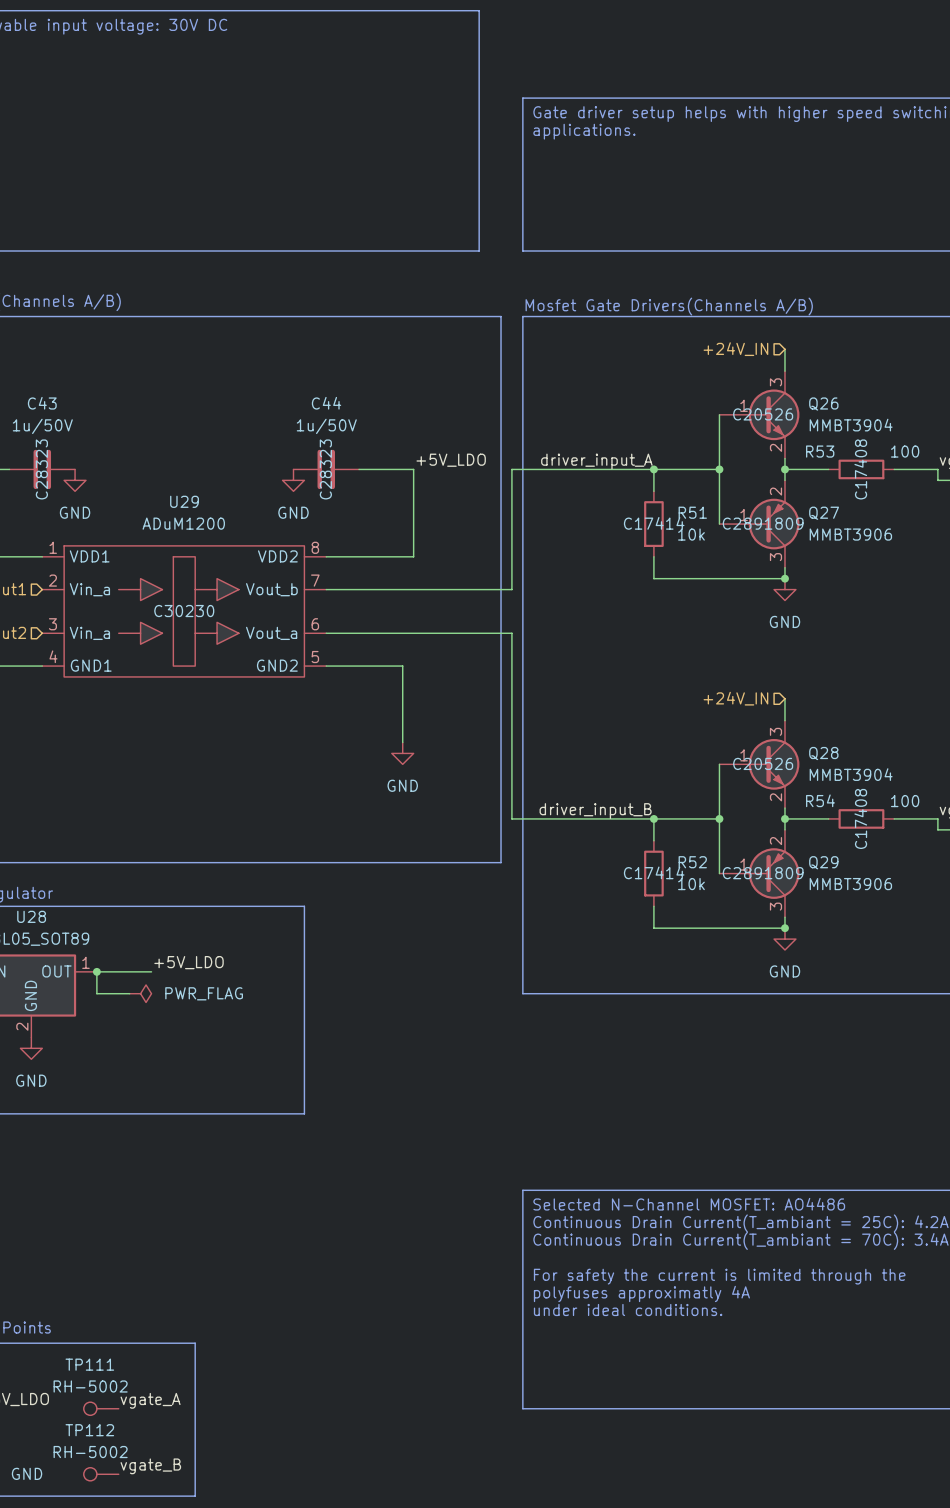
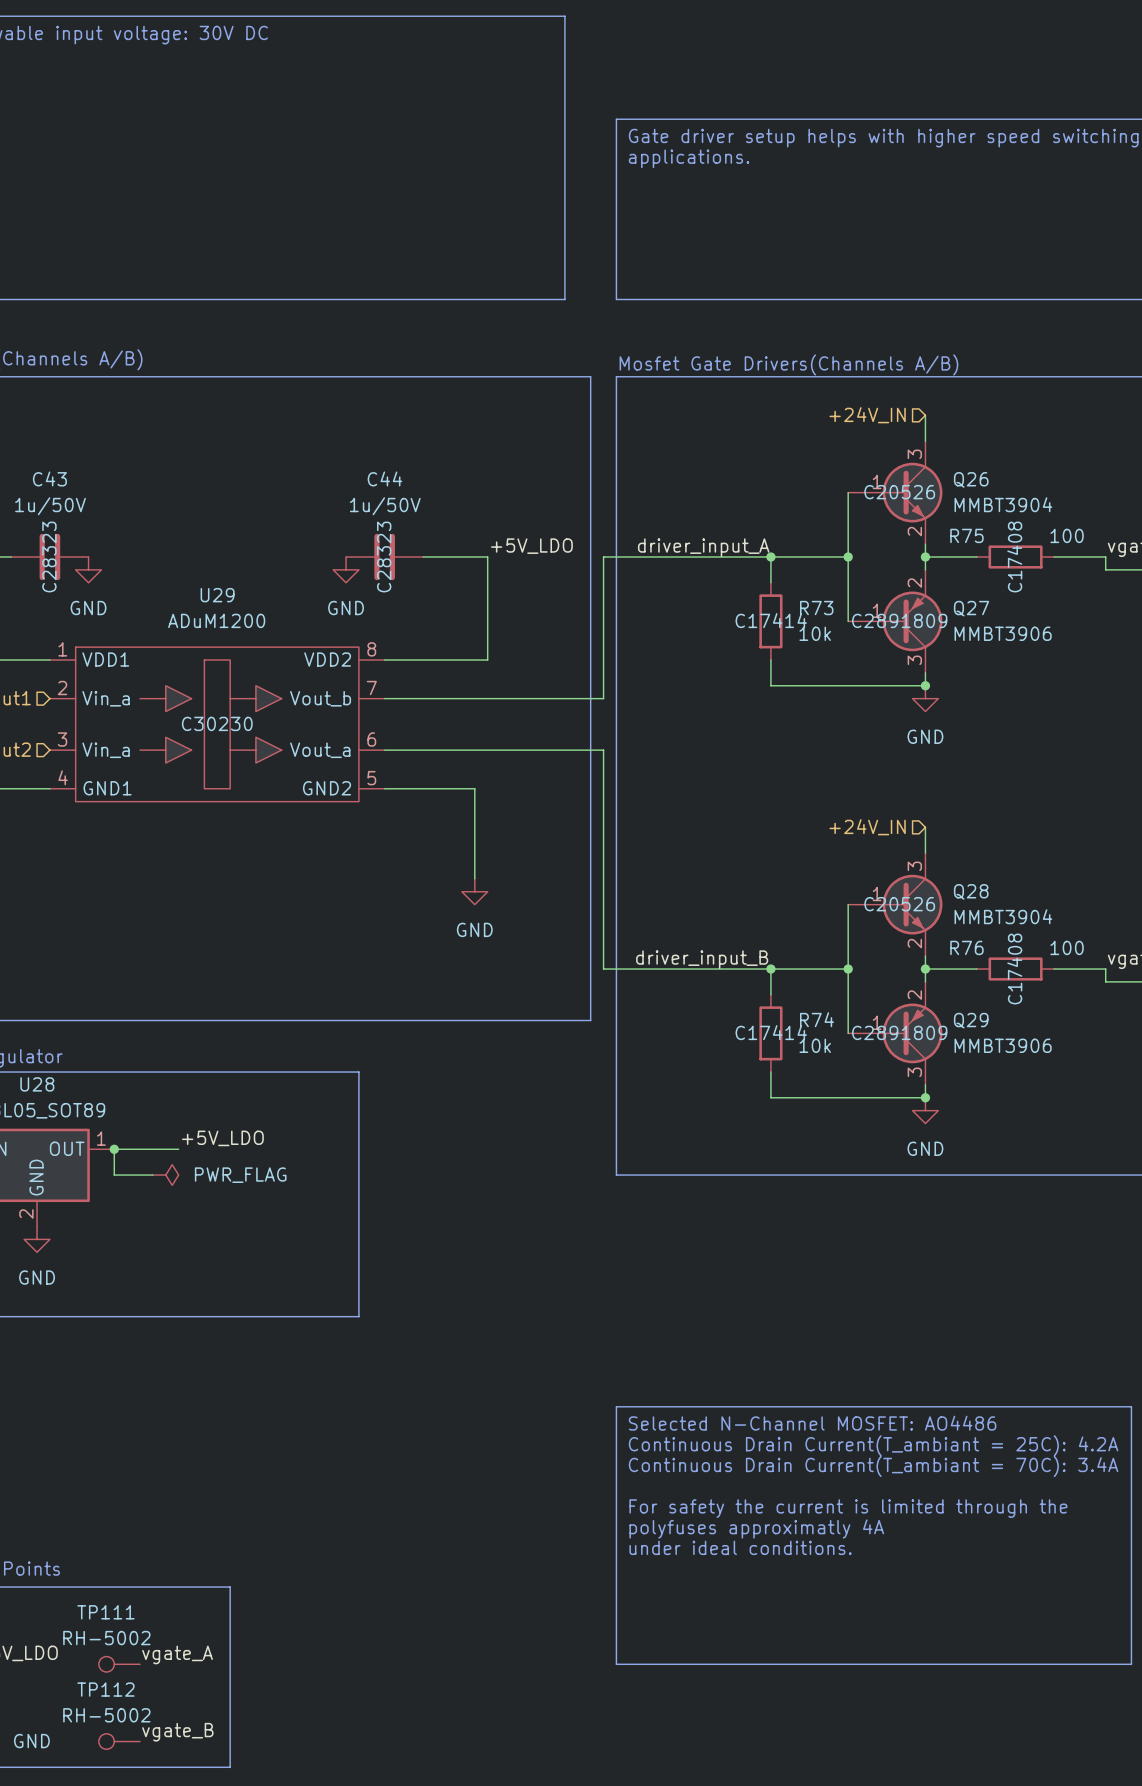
R53 name: R53 (820, 451) -> R75 (966, 535)
R51 name: R51 (692, 512) -> R73 (816, 608)
R54 name: R54 (820, 800) -> R76 (966, 947)
R52 name: R52 (692, 862) -> R74 (817, 1019)

